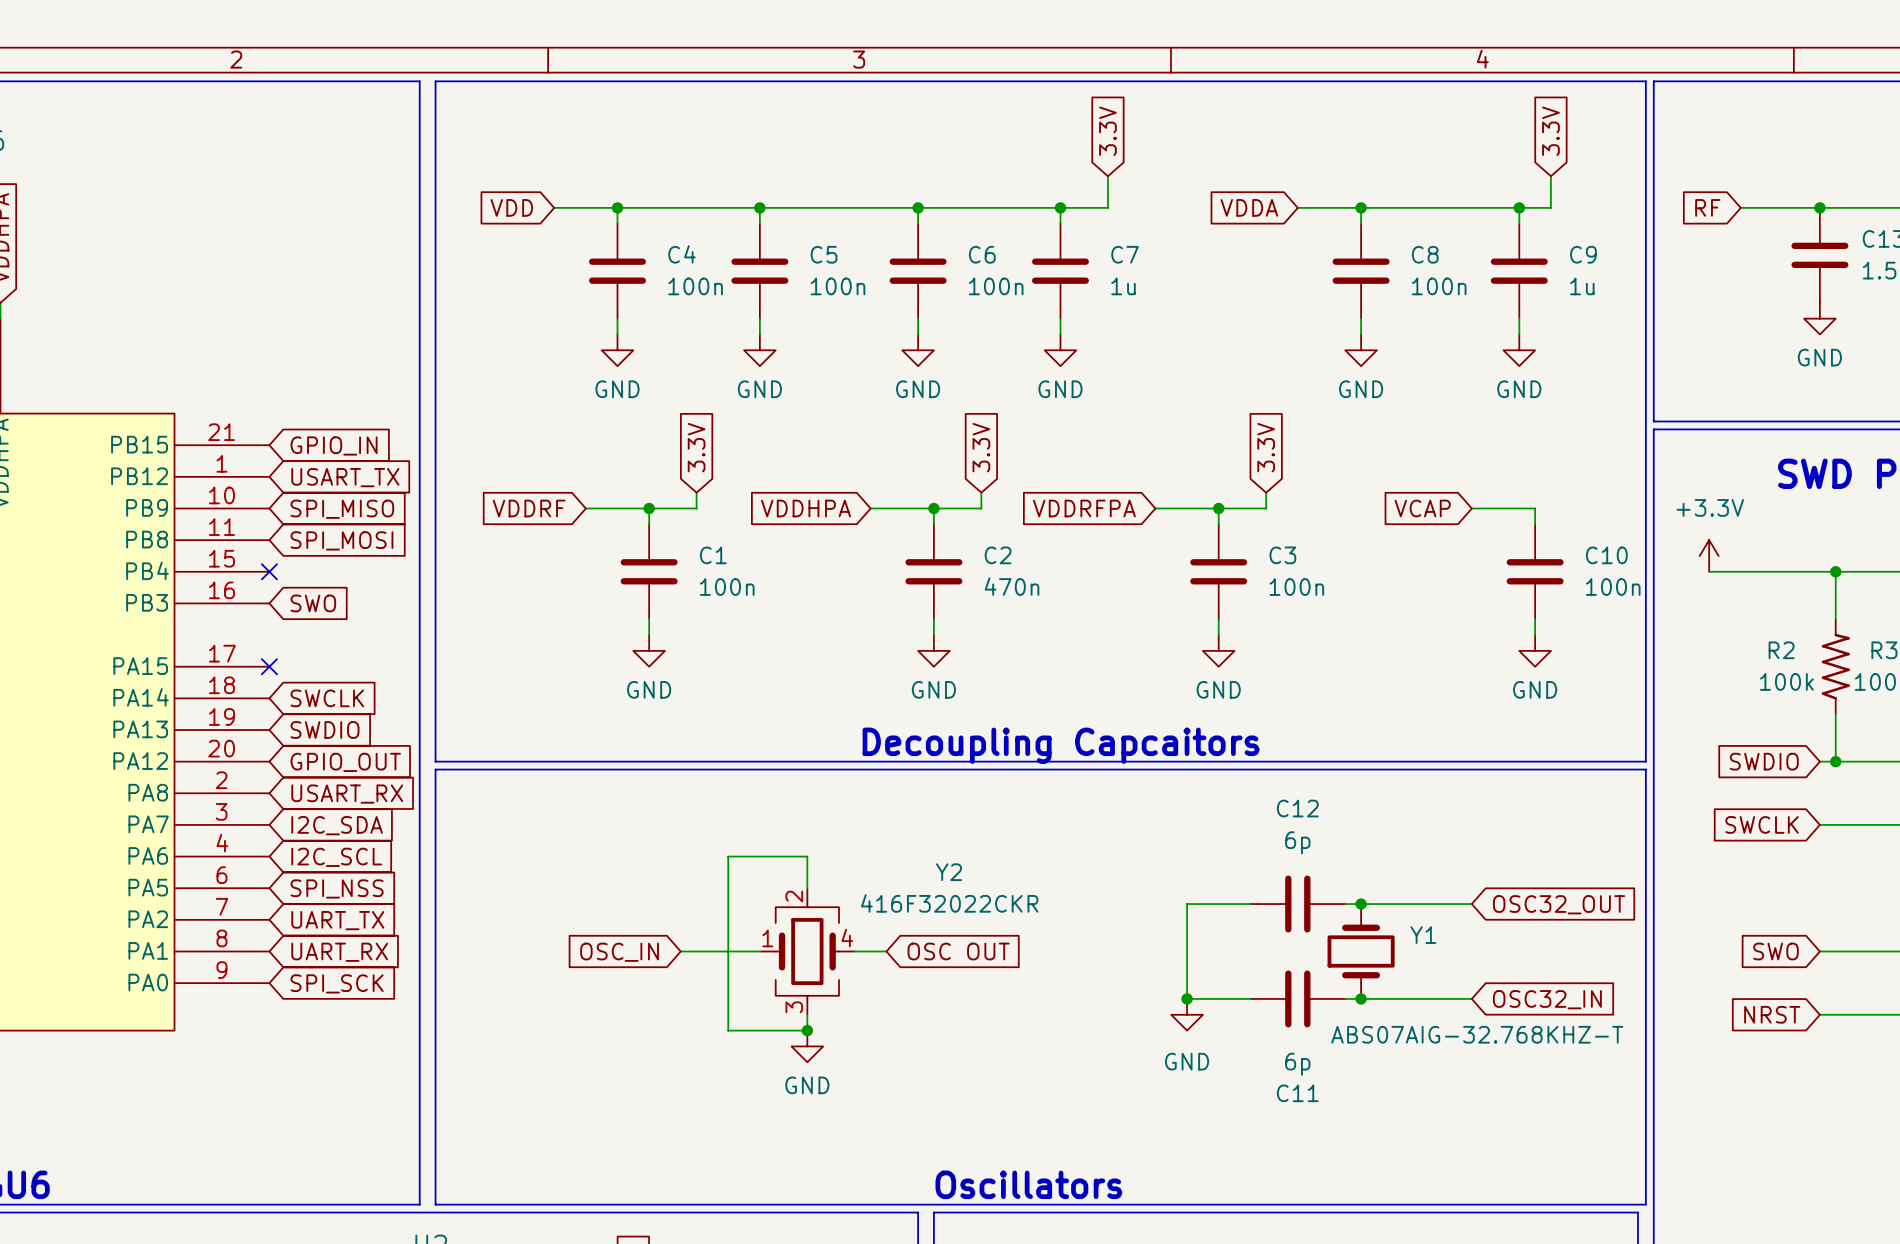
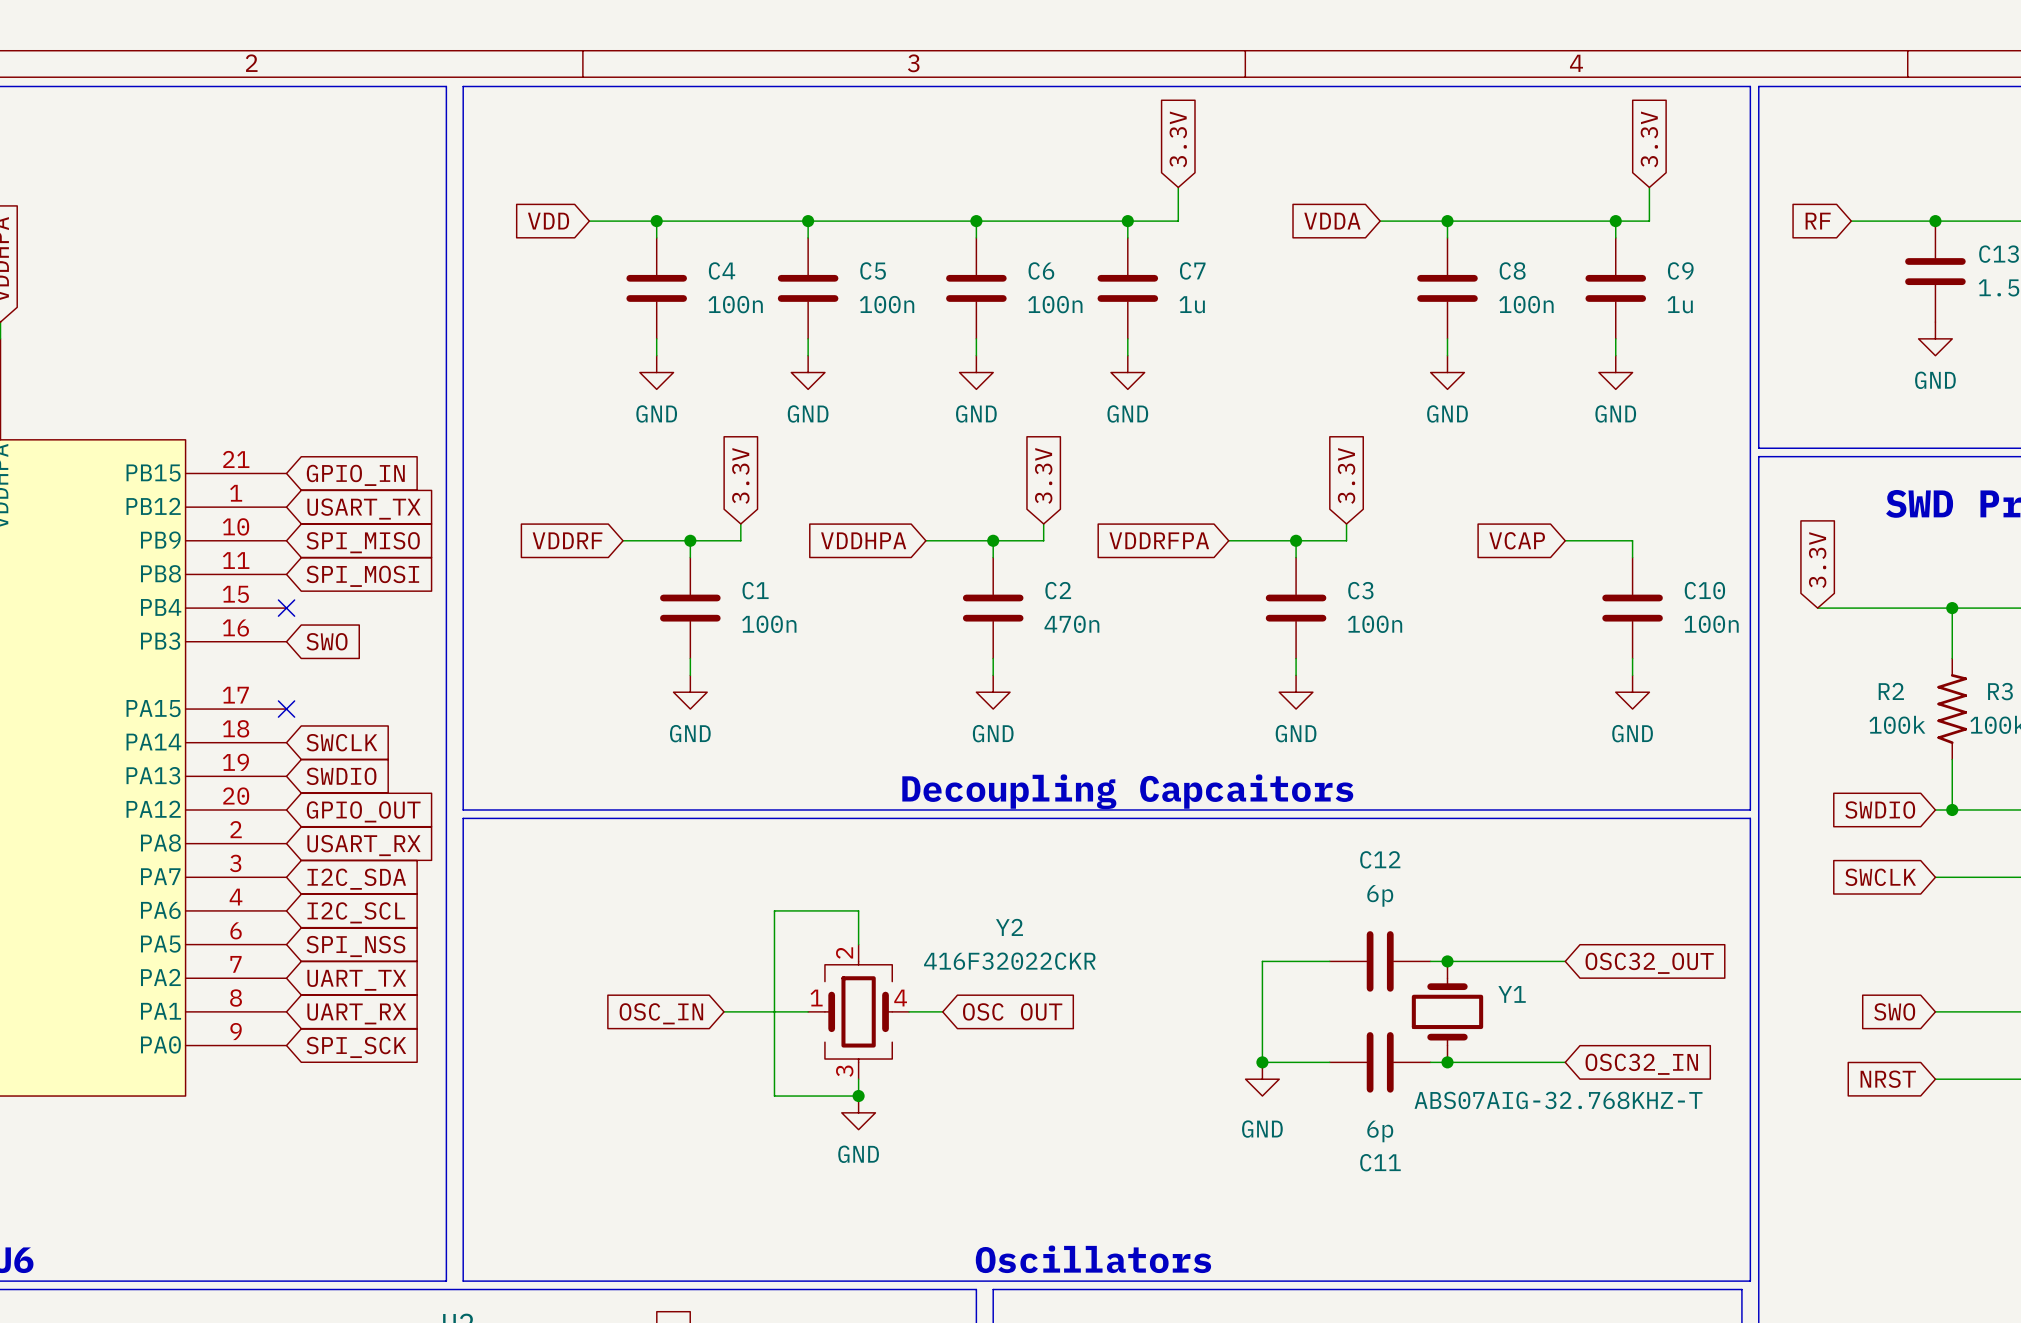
global label: none -> 3.3V (1817, 560)
power symbol: +3.3V (1709, 555) -> none

